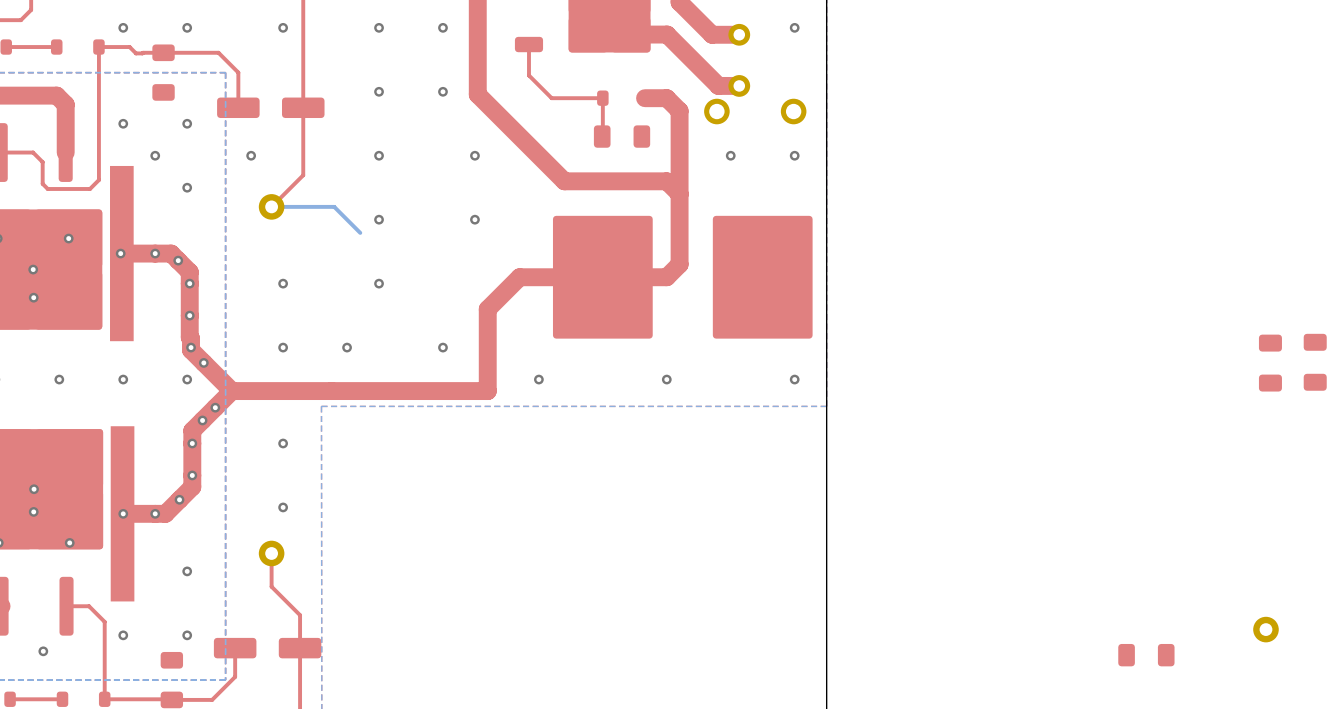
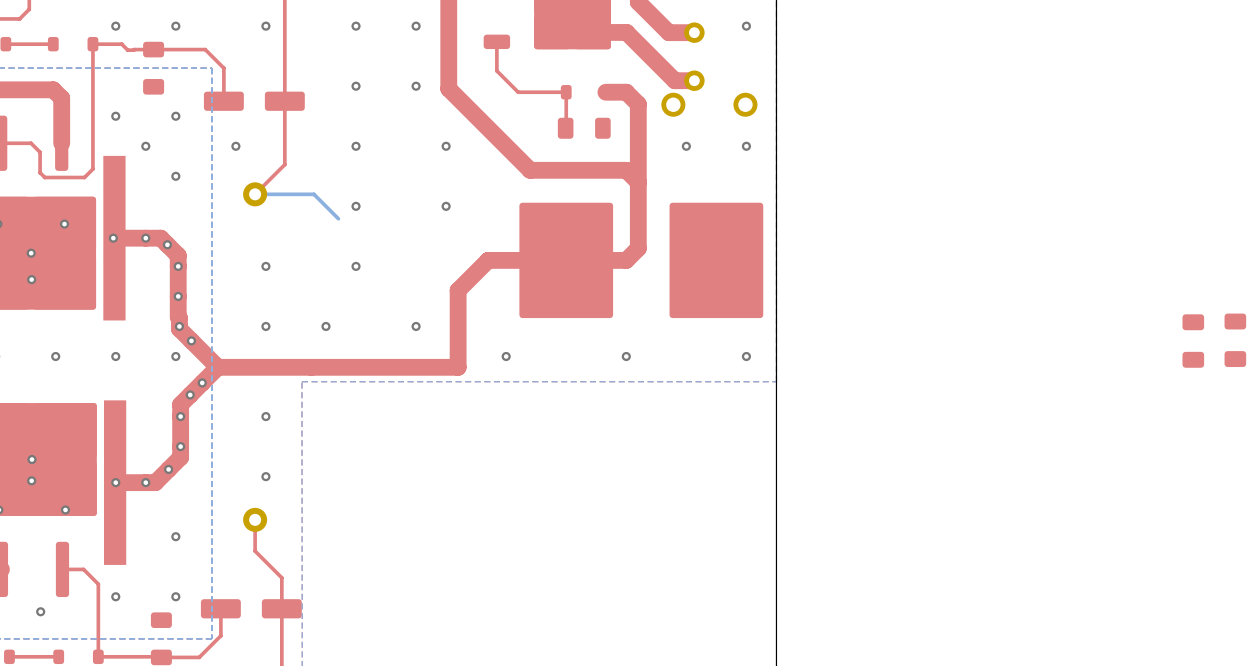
part: (1265, 629) -> none
part: (1146, 655) -> none

